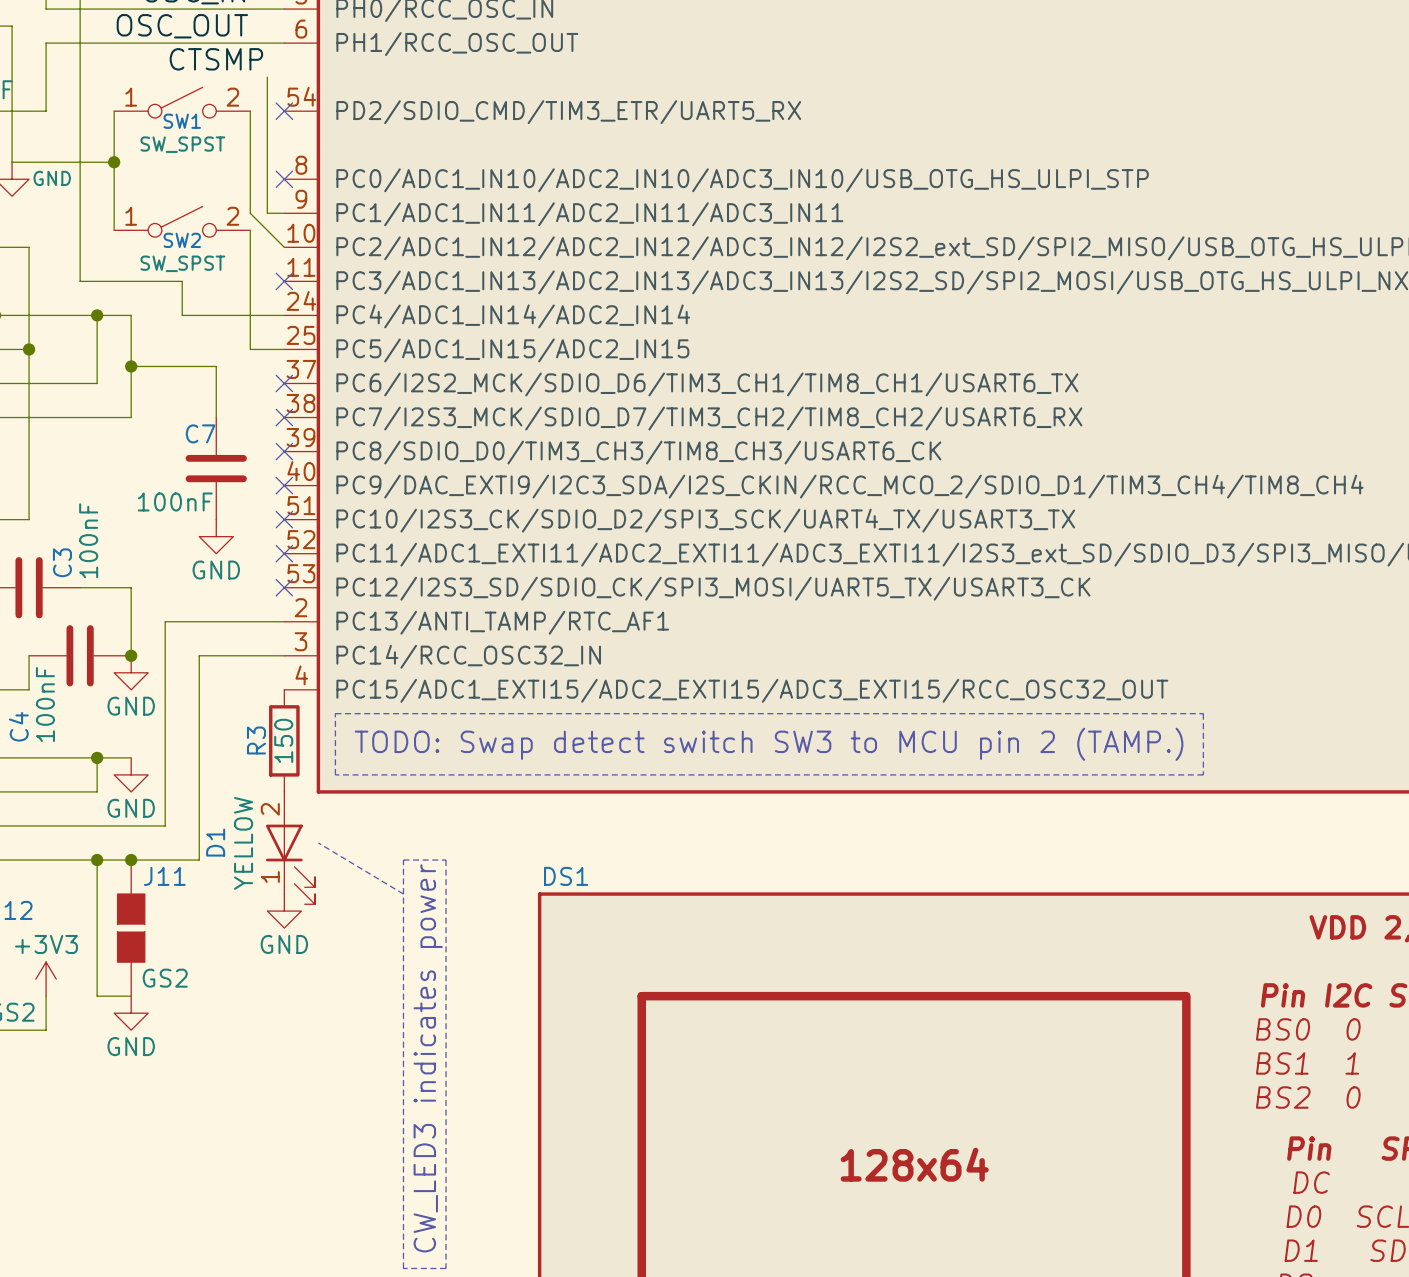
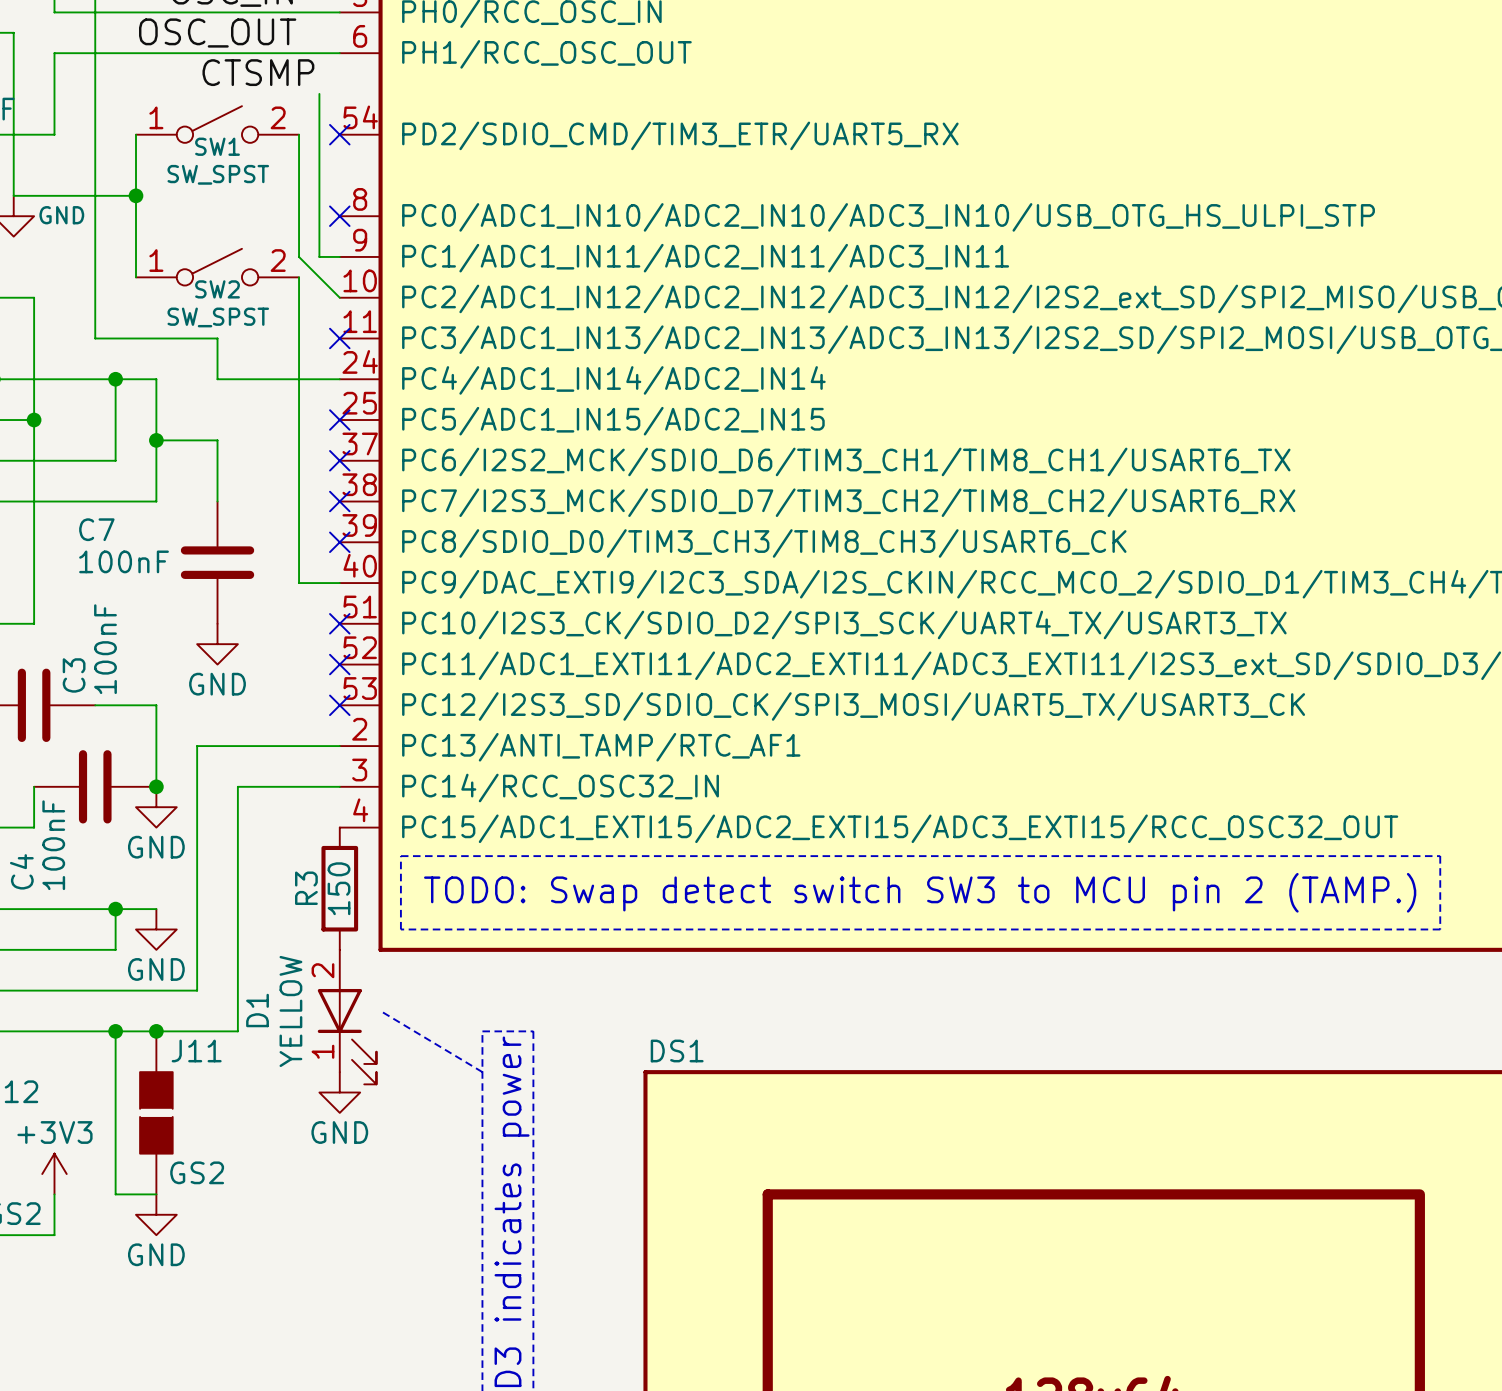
wire: (250, 349) (284, 349) -> (299, 420) (299, 583) (339, 583)
no-connect mark: none -> (339, 420)
wire: (182, 366) (216, 366) (216, 417) -> (217, 440) (217, 501)
C7 name position: C7 (200, 433) -> C7 (96, 529)
C7 position: (216, 468) -> (217, 562)
no-connect mark: (284, 485) -> none
C7 value position: 100nF (175, 501) -> 100nF (124, 561)
power symbol position: GND (216, 536) -> GND (217, 644)

